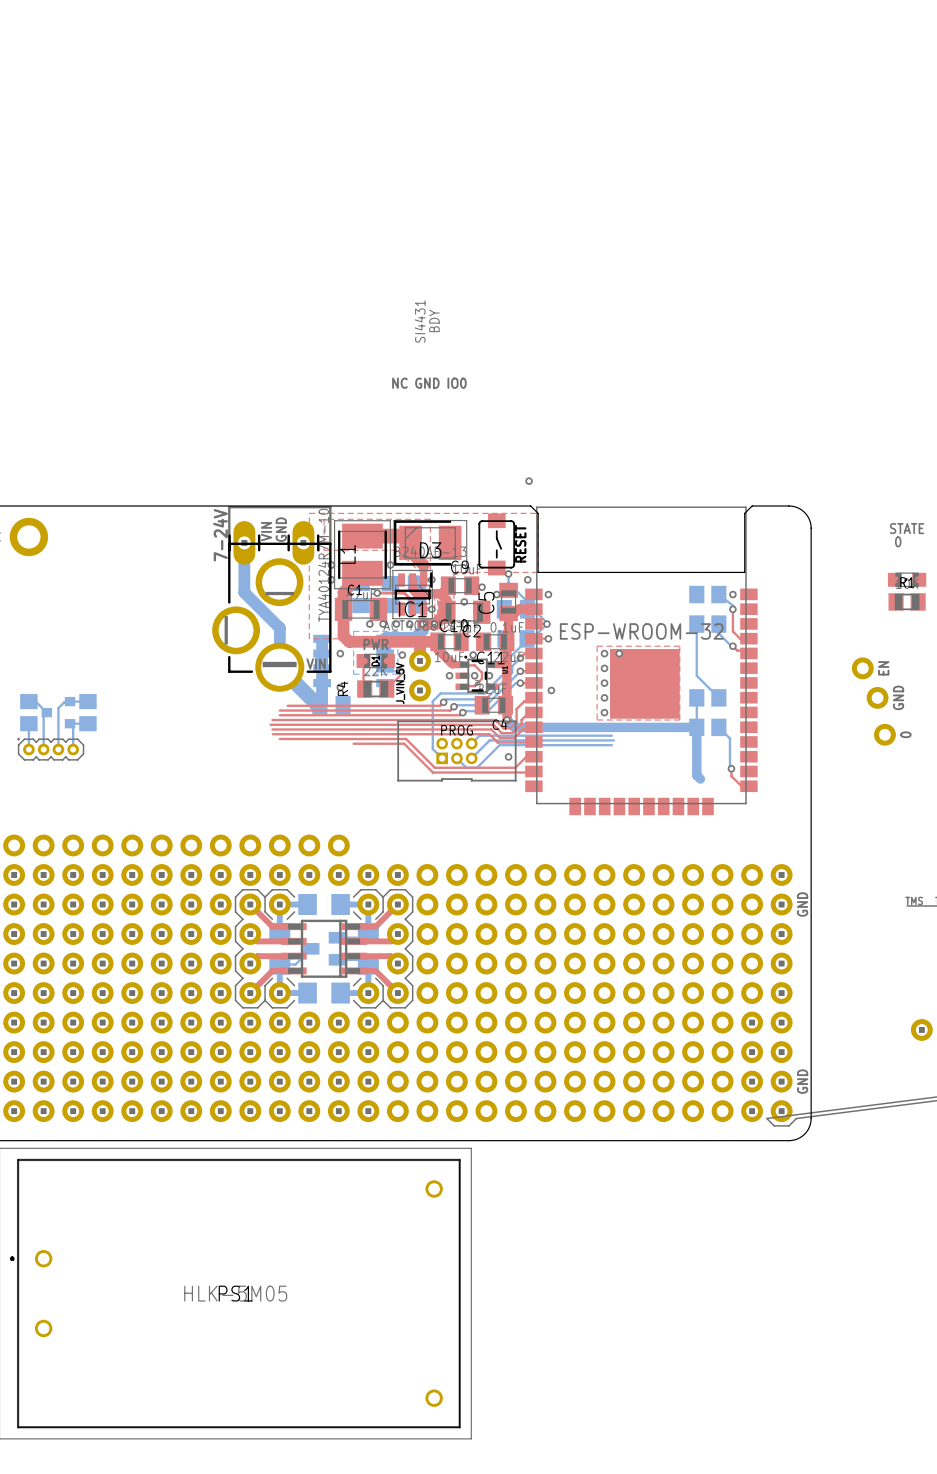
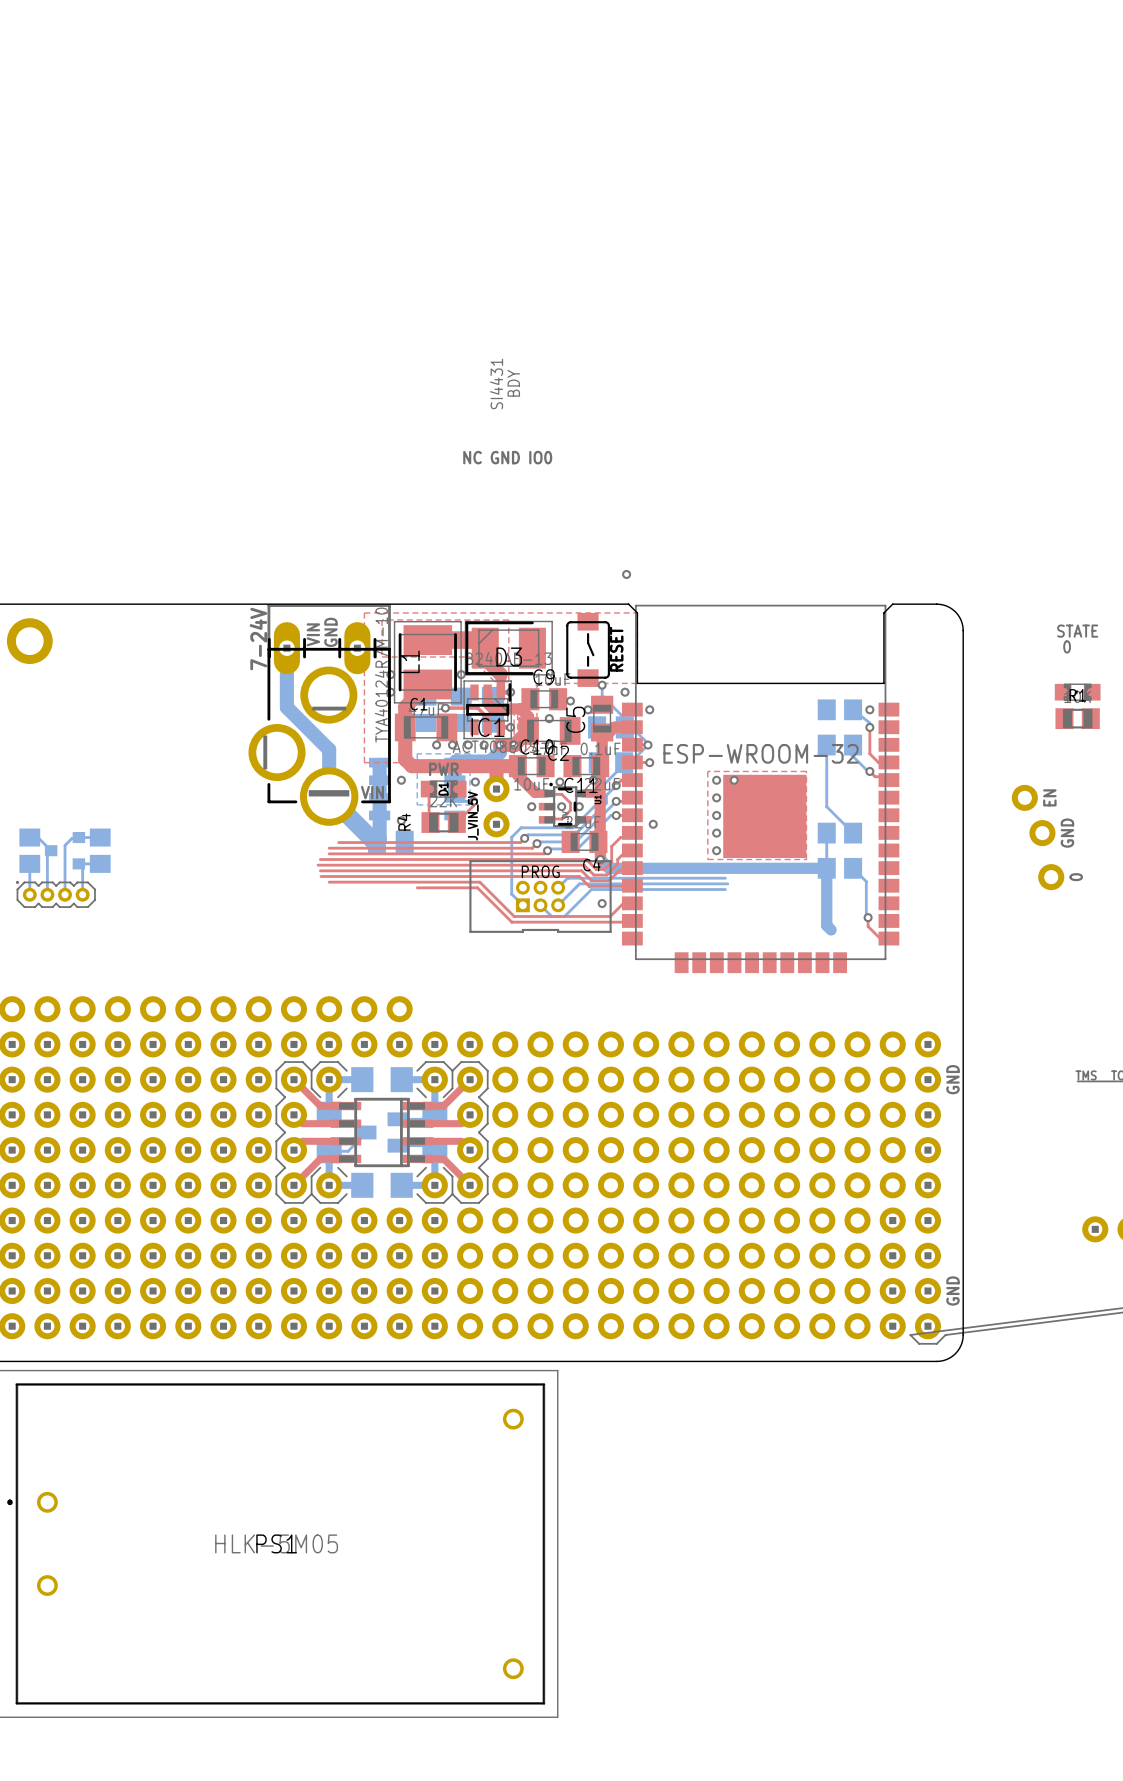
via: none -> (593, 780)

